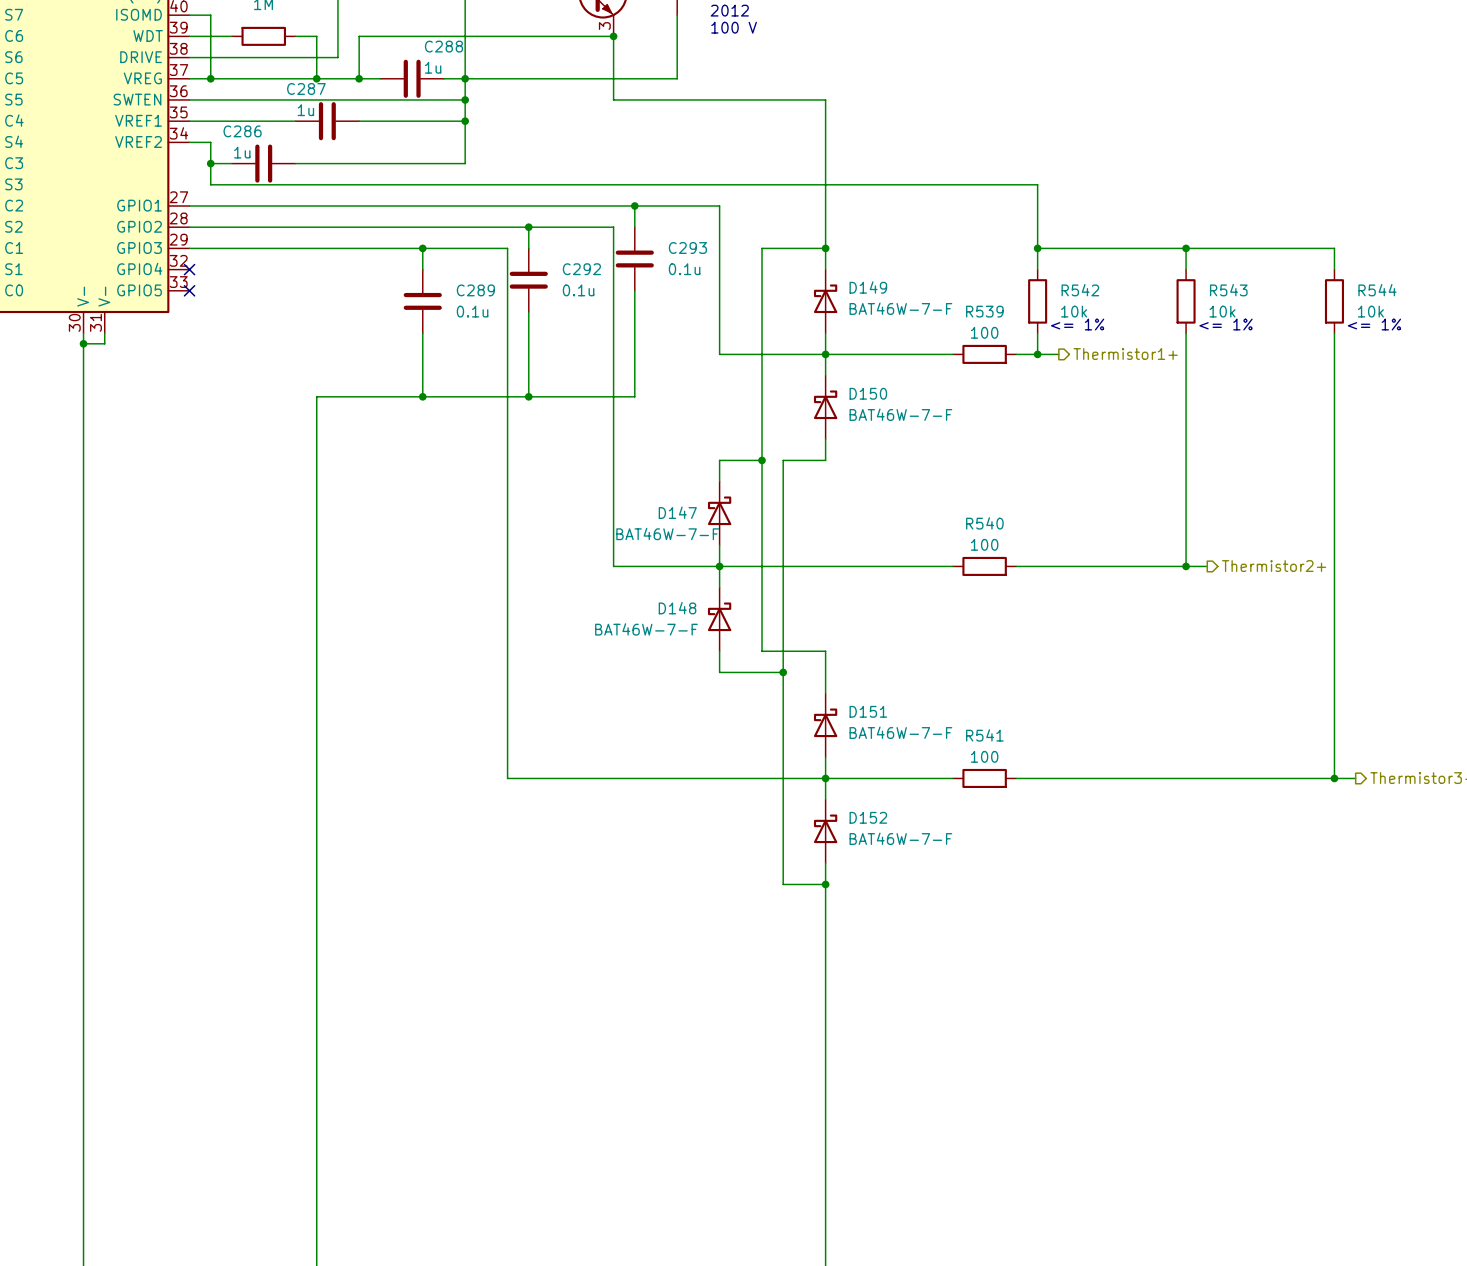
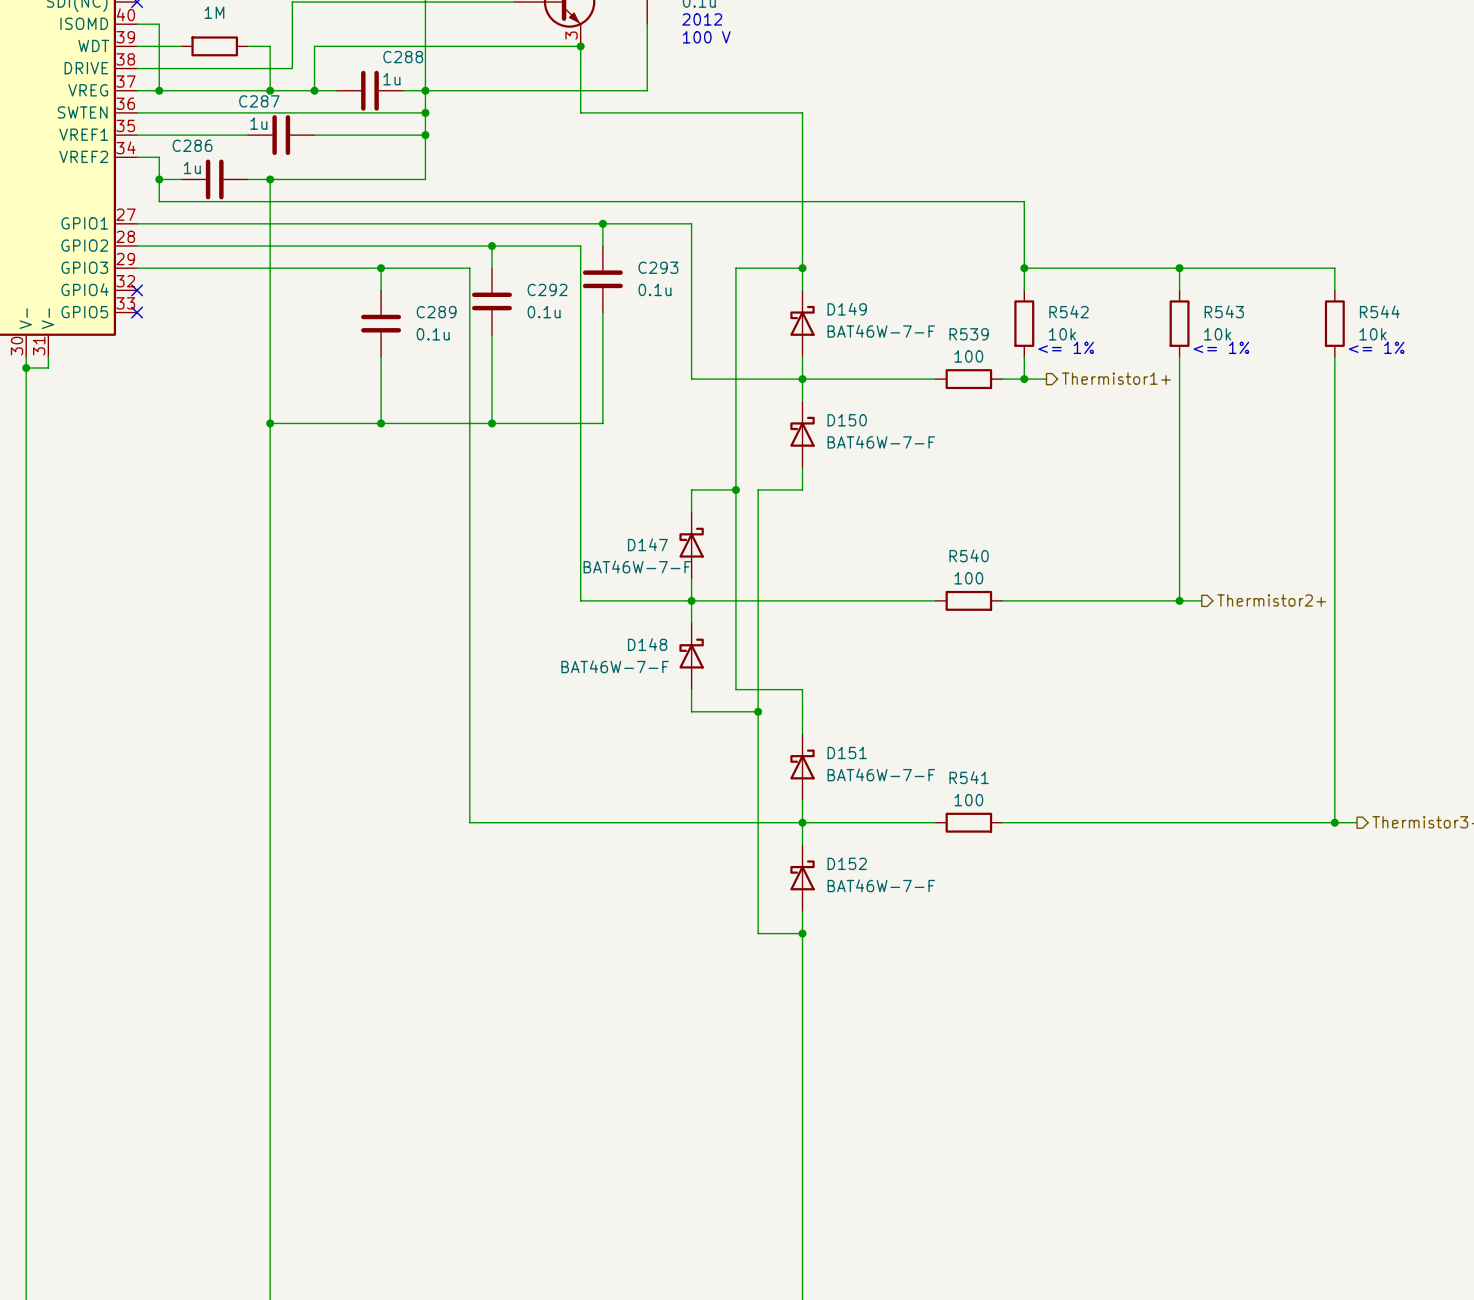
wire: none -> (270, 179) (270, 423)
junction: none -> (270, 179)
junction: none -> (270, 423)

